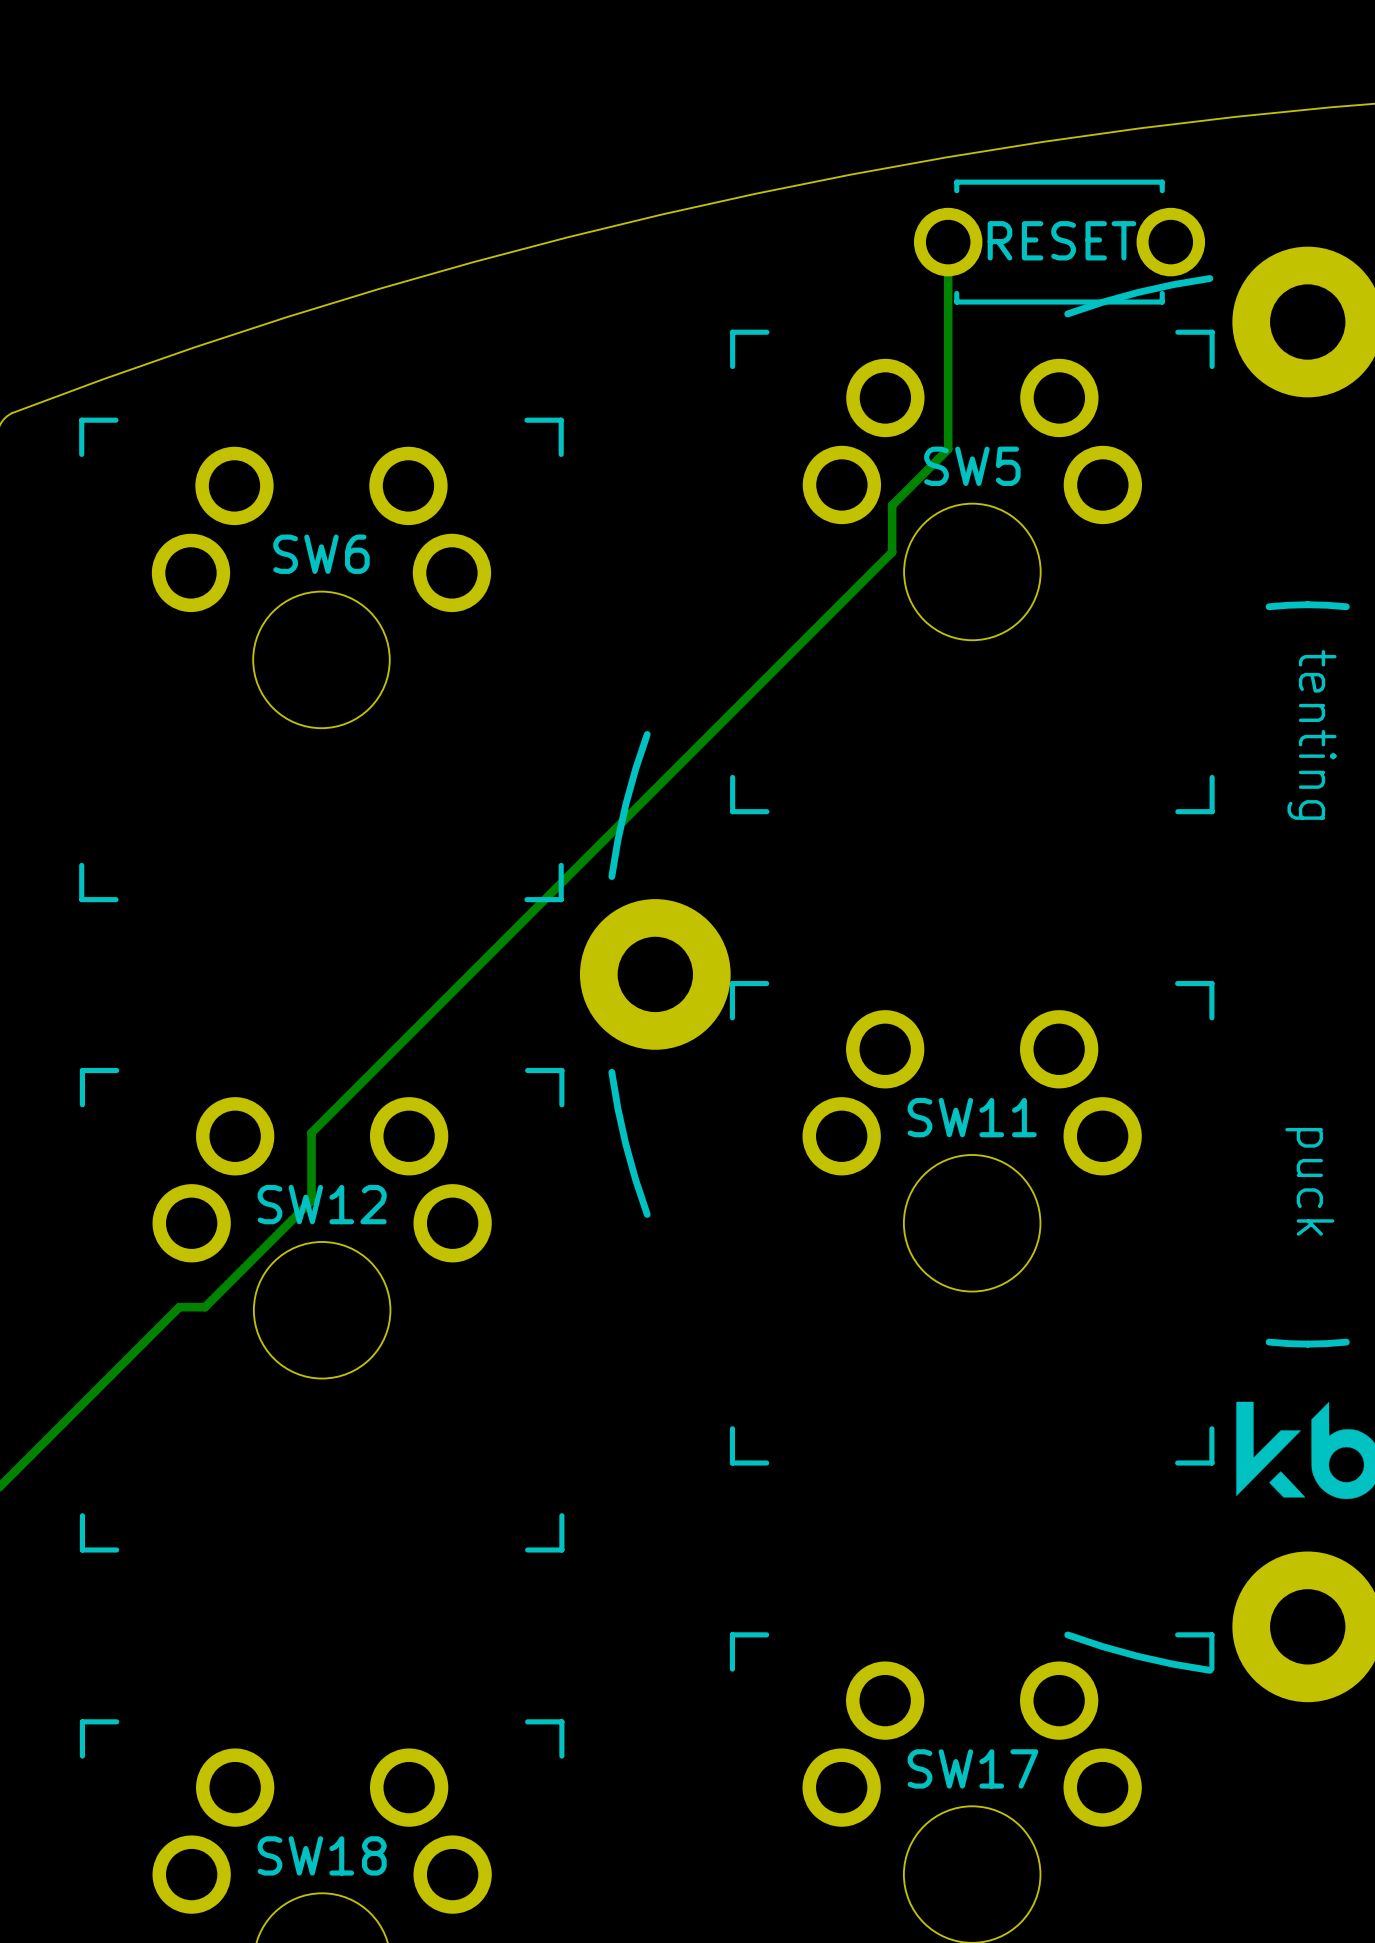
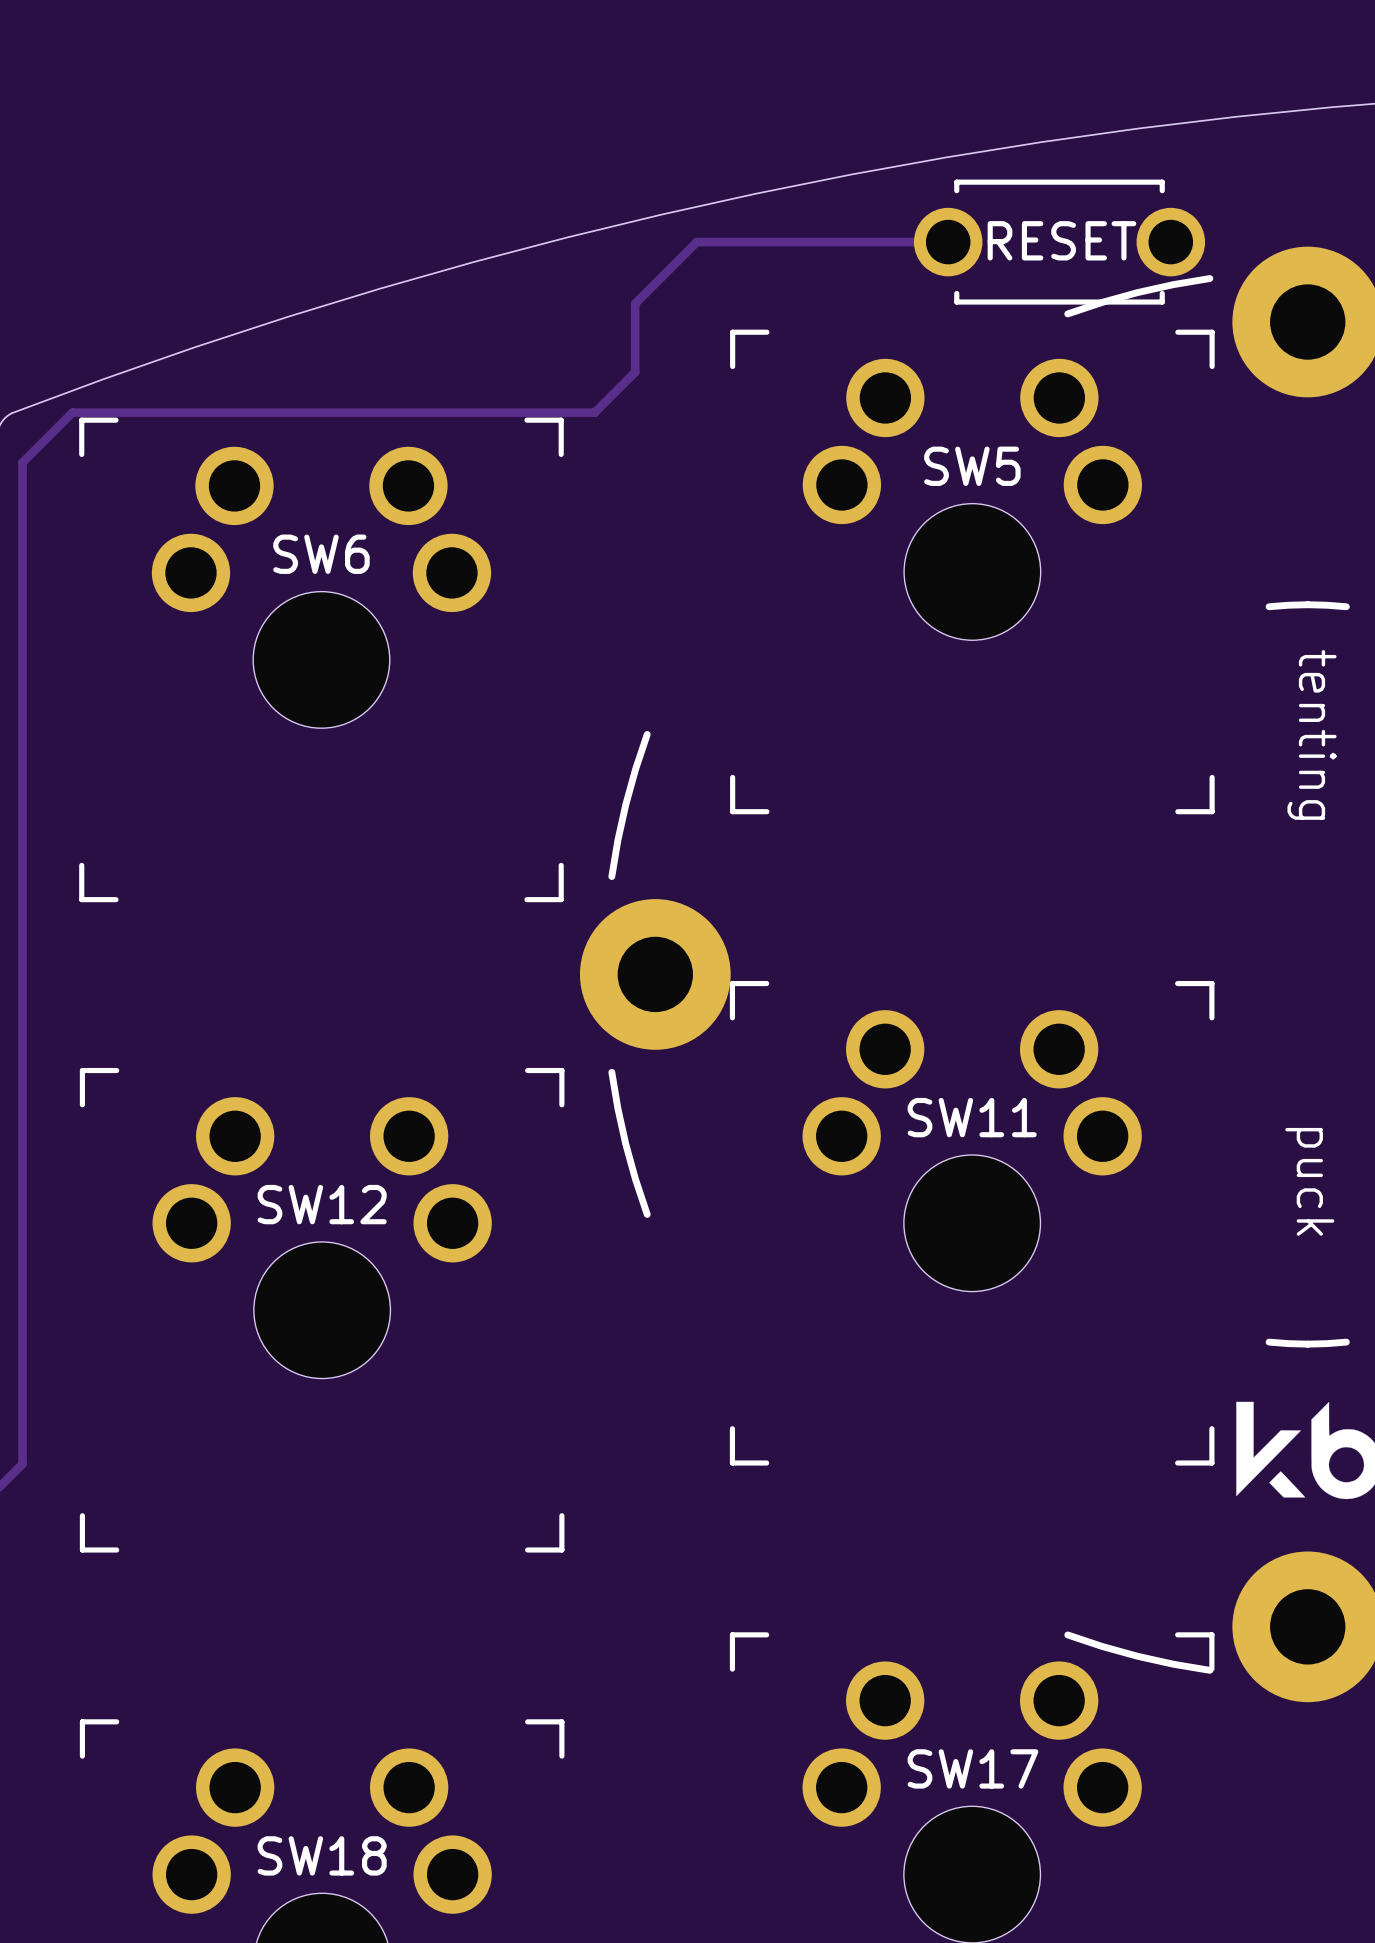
track: (948, 242) (948, 449) (892, 505) (892, 552) (311, 1132) (311, 1200) (205, 1307) (179, 1307) (22, 1464) -> (948, 242) (696, 242) (635, 303) (635, 372) (594, 412) (72, 412) (22, 462) (22, 1464)

